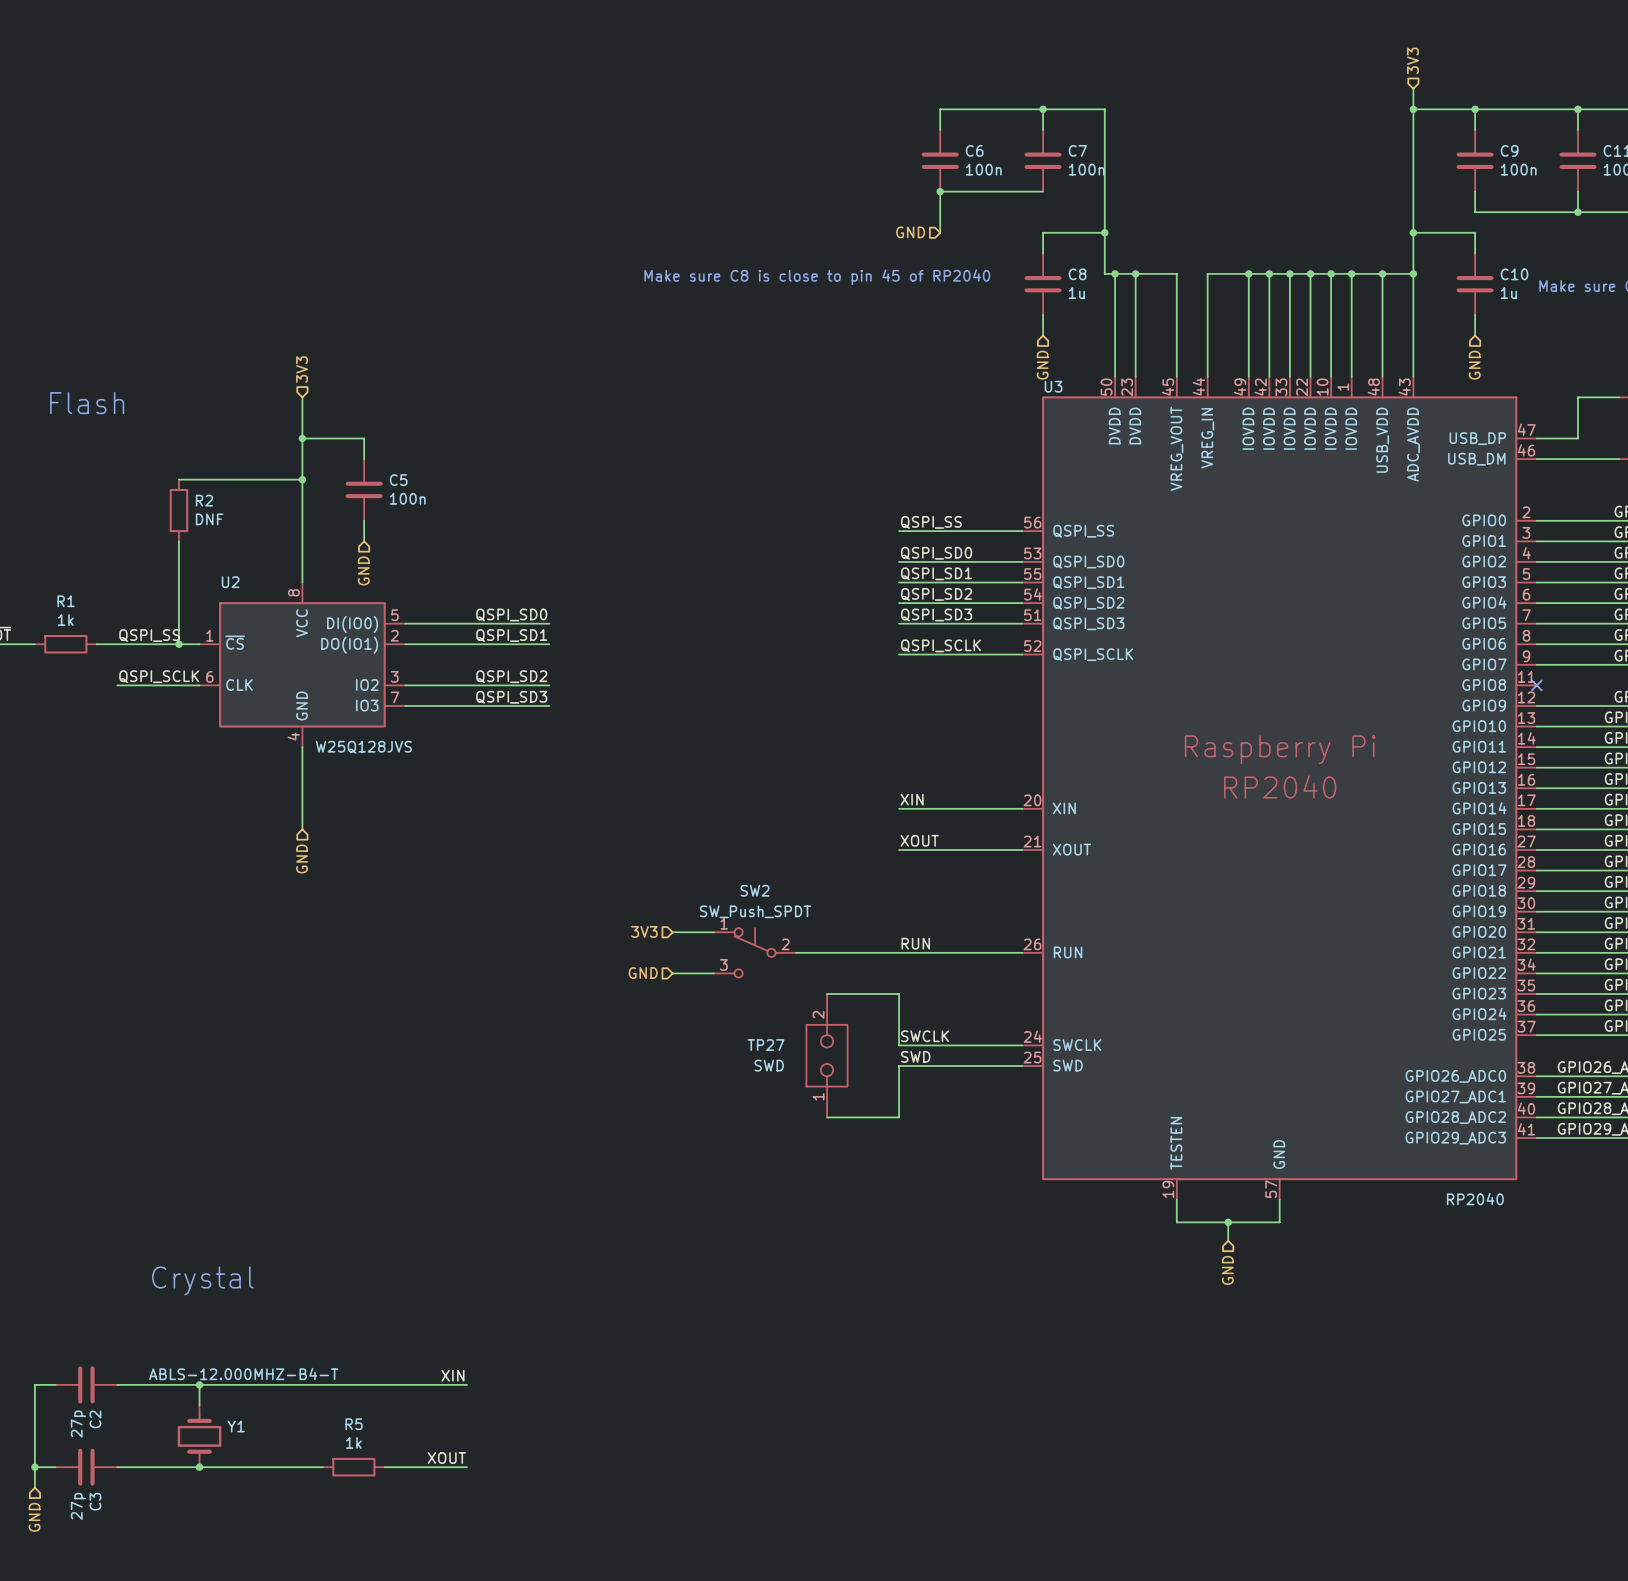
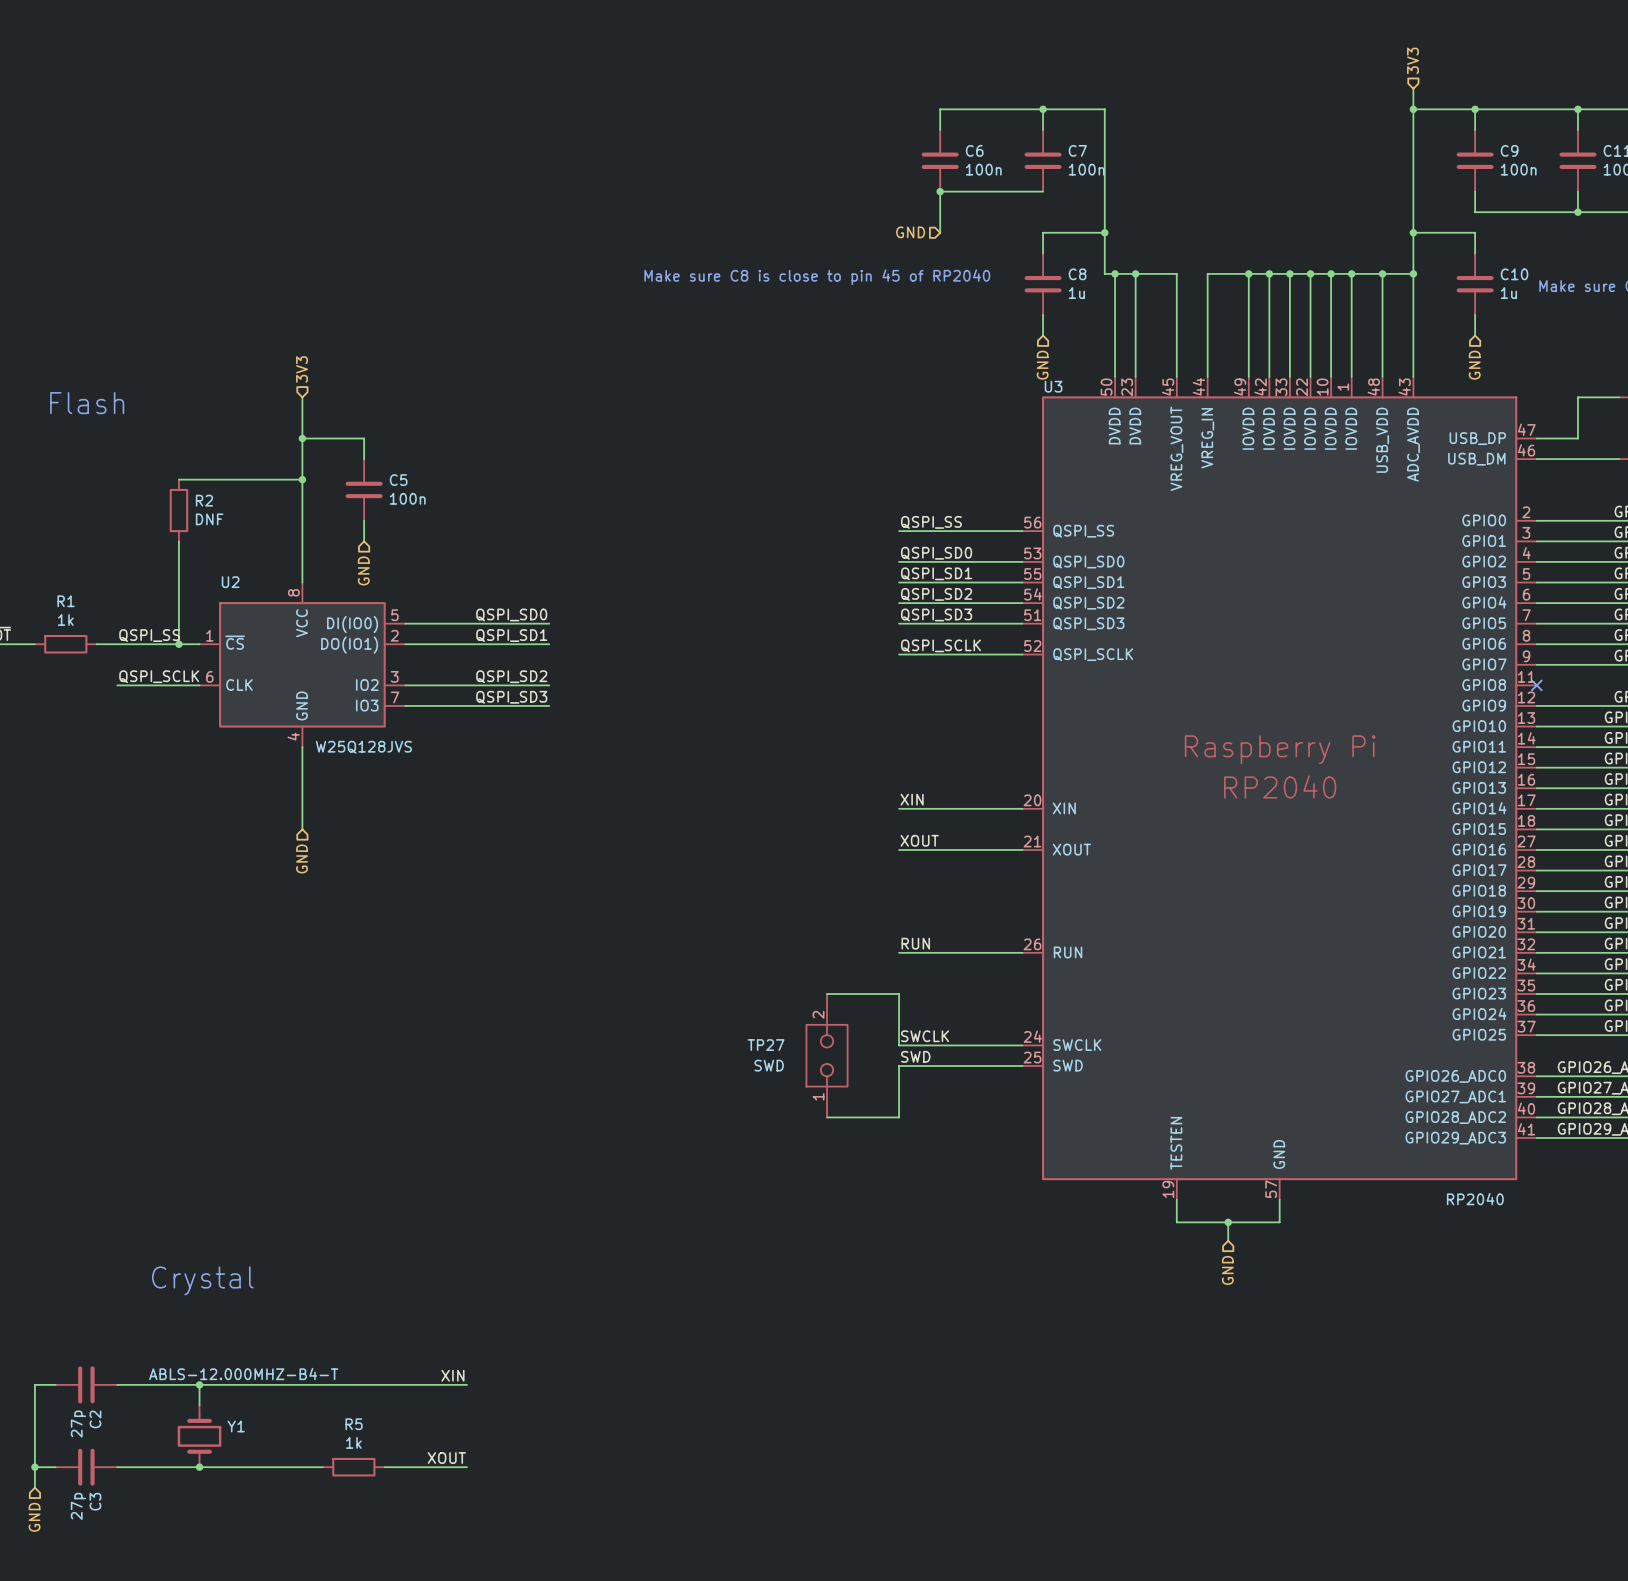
hierarchical label: 3V3 (644, 931) -> none
wire: (672, 932) (713, 932) -> none
SW2: SW_Push_SPDT (755, 952) -> none
wire: (796, 952) (899, 952) -> none
hierarchical label: GND (643, 973) -> none
wire: (672, 973) (713, 973) -> none

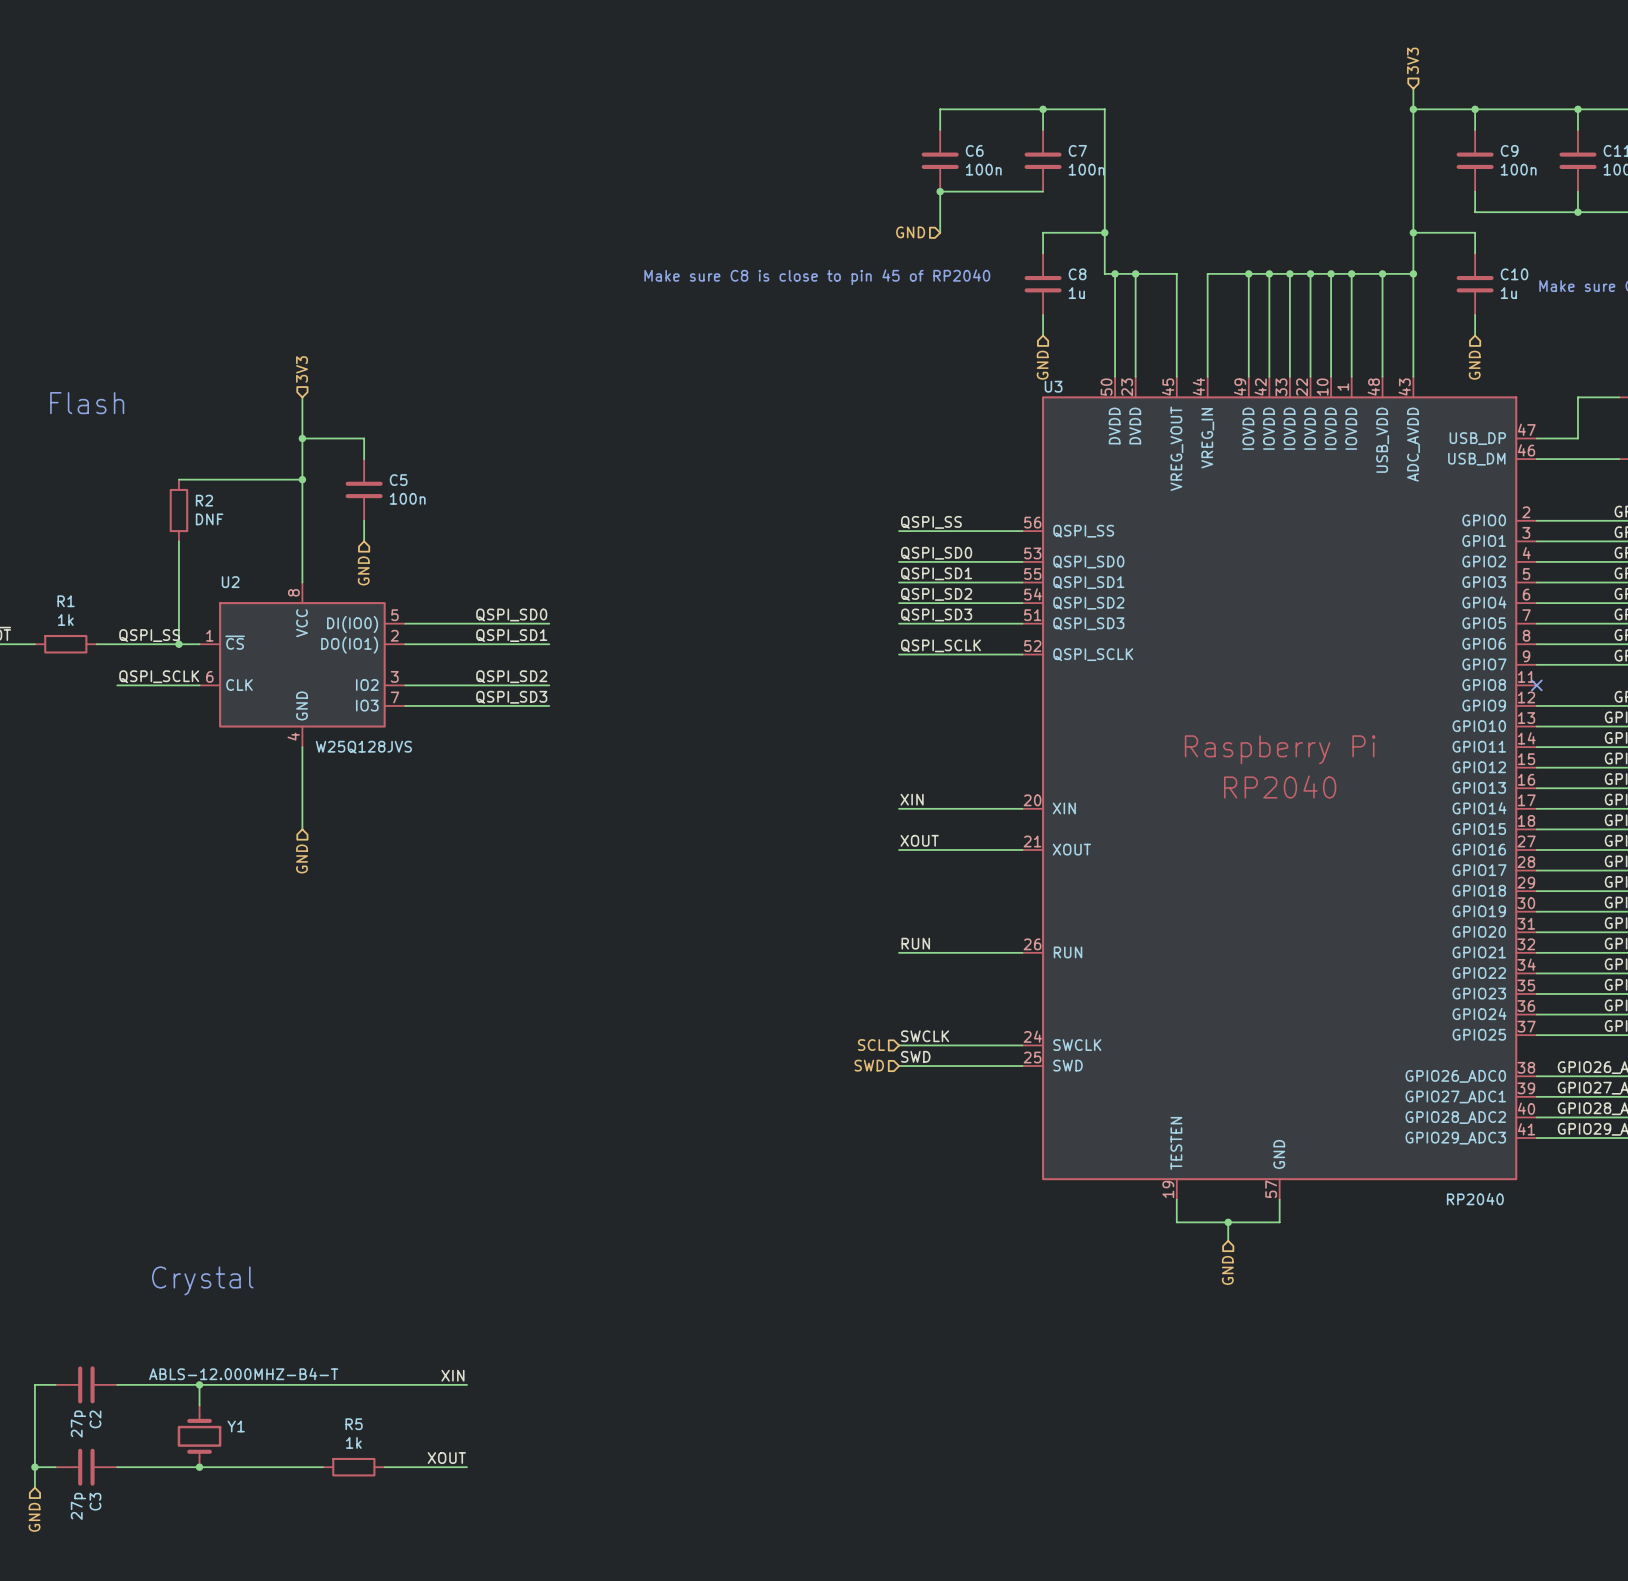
wire: (827, 994) (899, 994) (899, 1045) -> none
hierarchical label: none -> SCL (871, 1045)
TP27: SWD (827, 1055) -> none
hierarchical label: none -> SWD (869, 1065)
wire: (899, 1066) (899, 1117) (827, 1117) -> none

